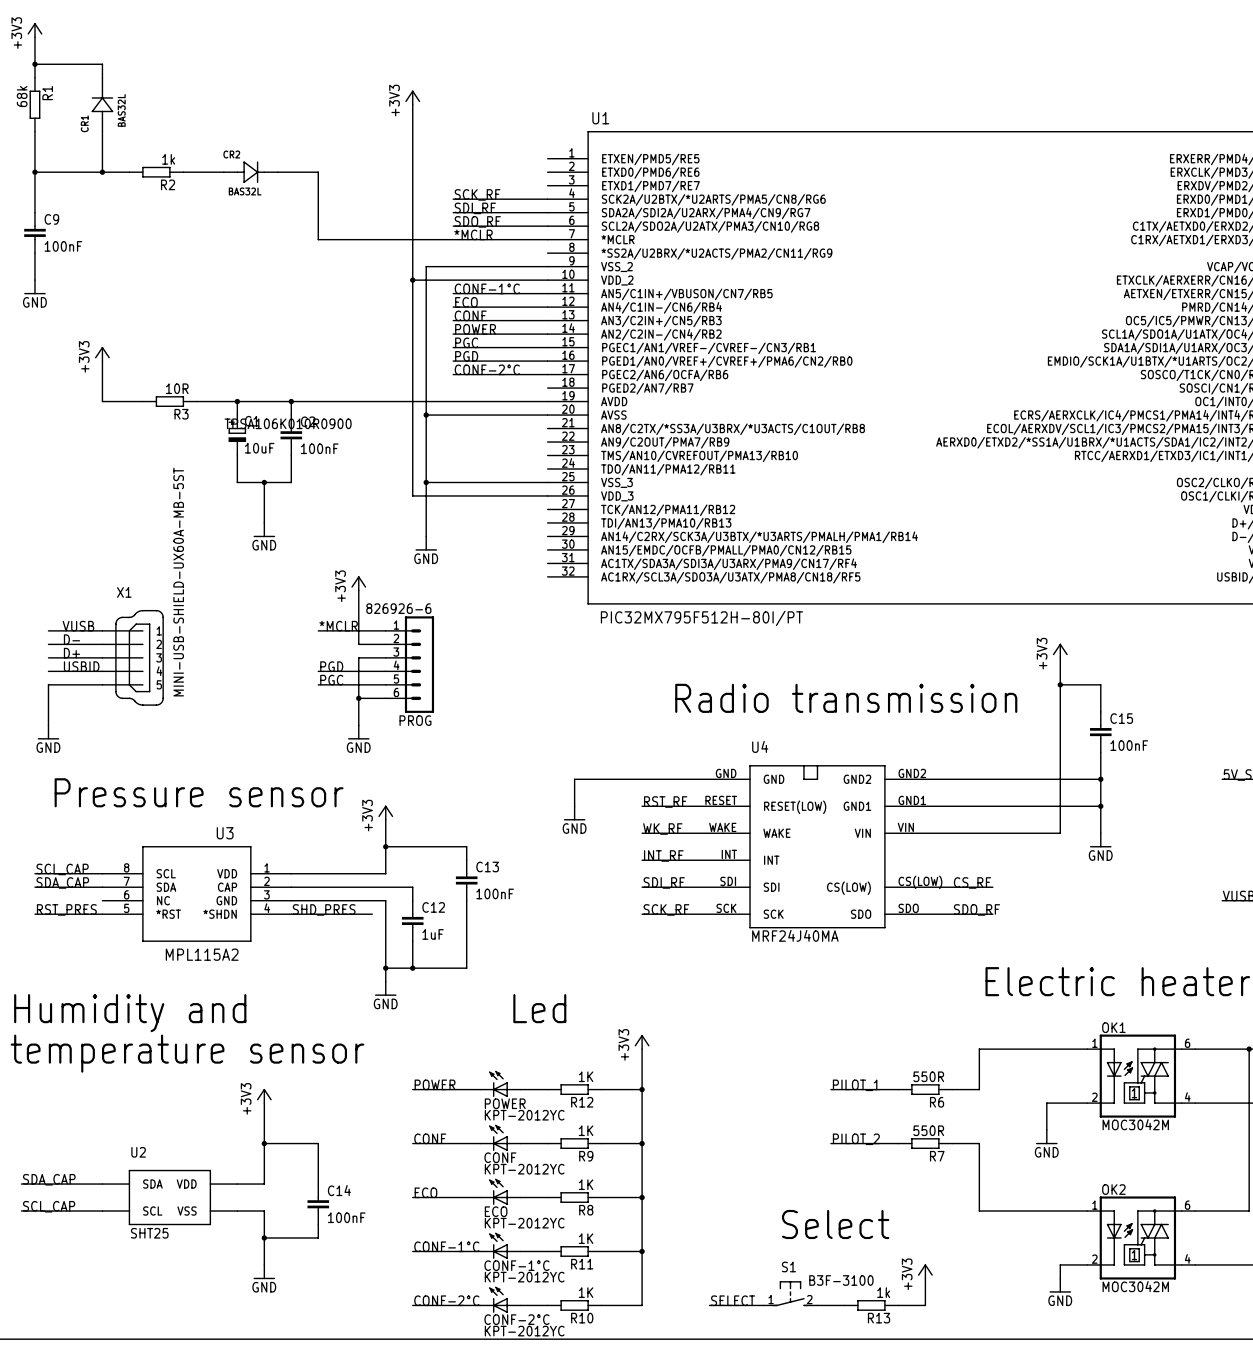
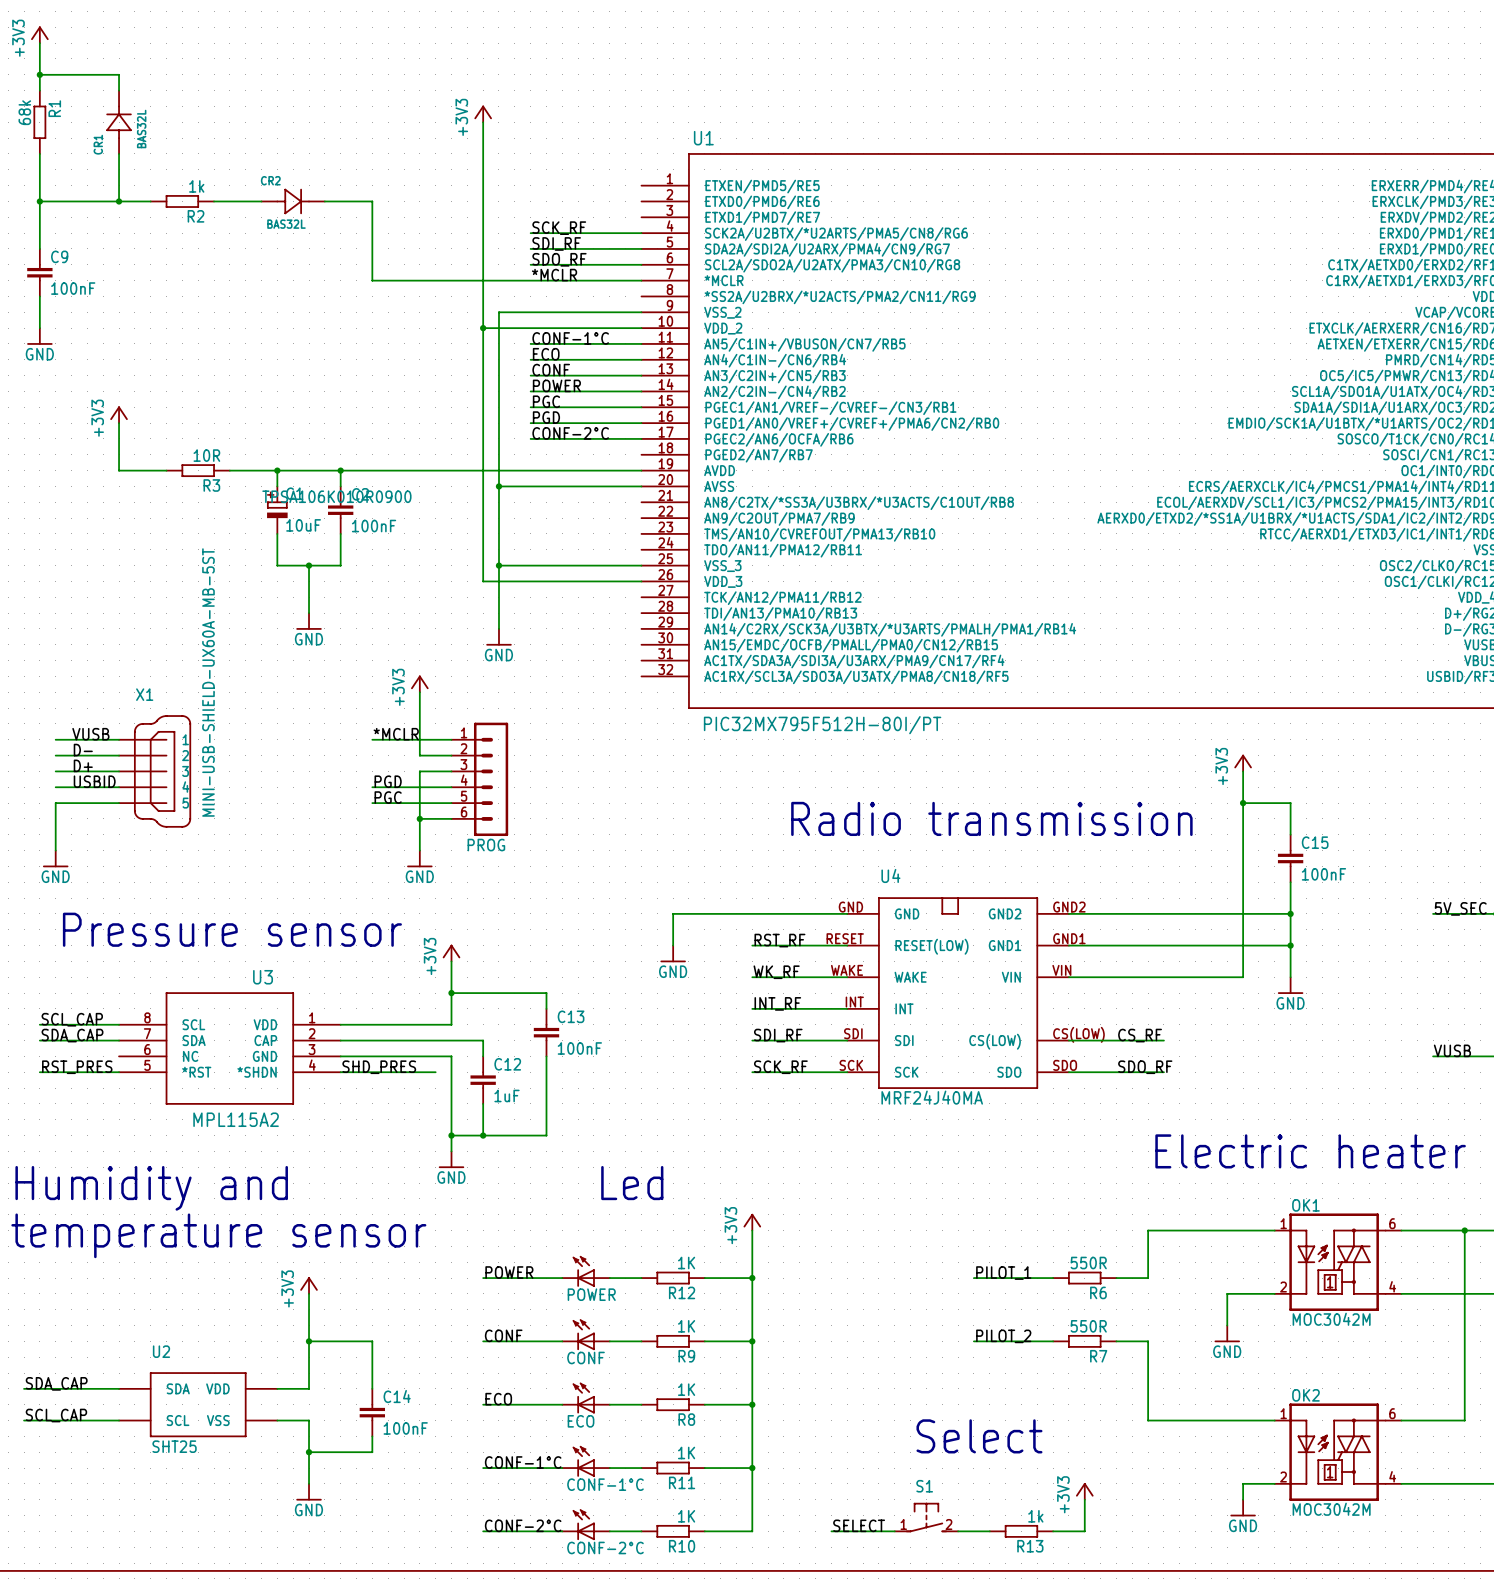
PROG value: 826926-6 (398, 608) -> none
POWER value: KPT-2012YC (524, 1115) -> none
CONF value: KPT-2012YC (524, 1169) -> none
ECO value: KPT-2012YC (524, 1223) -> none
CONF-1°C value: KPT-2012YC (524, 1277) -> none
S1 value: B3F-3100 (841, 1280) -> none
CONF-2°C value: KPT-2012YC (524, 1331) -> none

